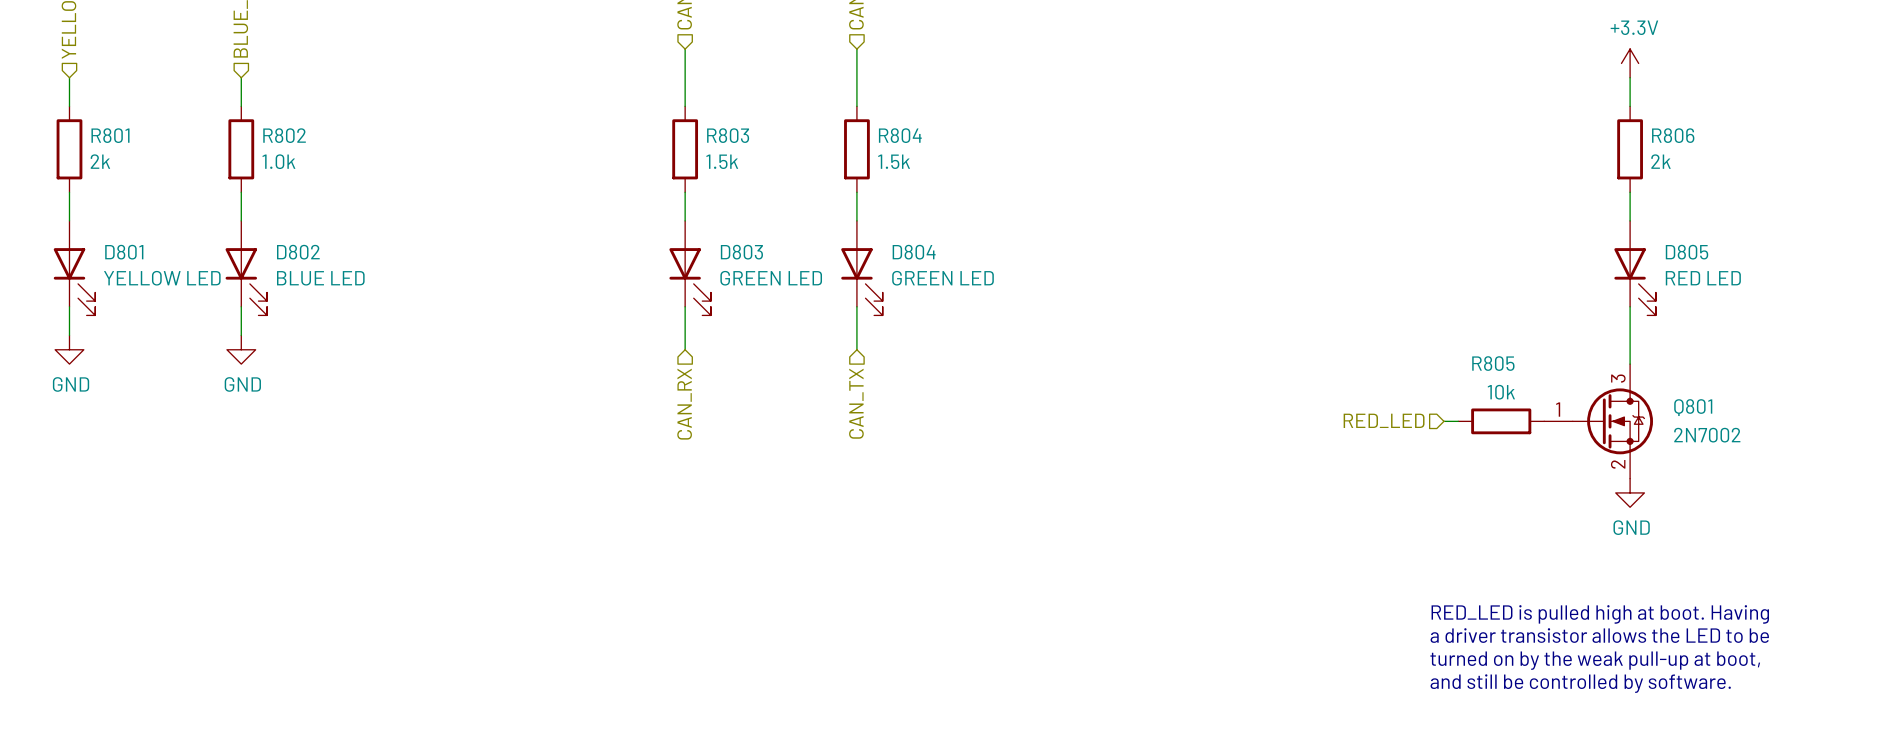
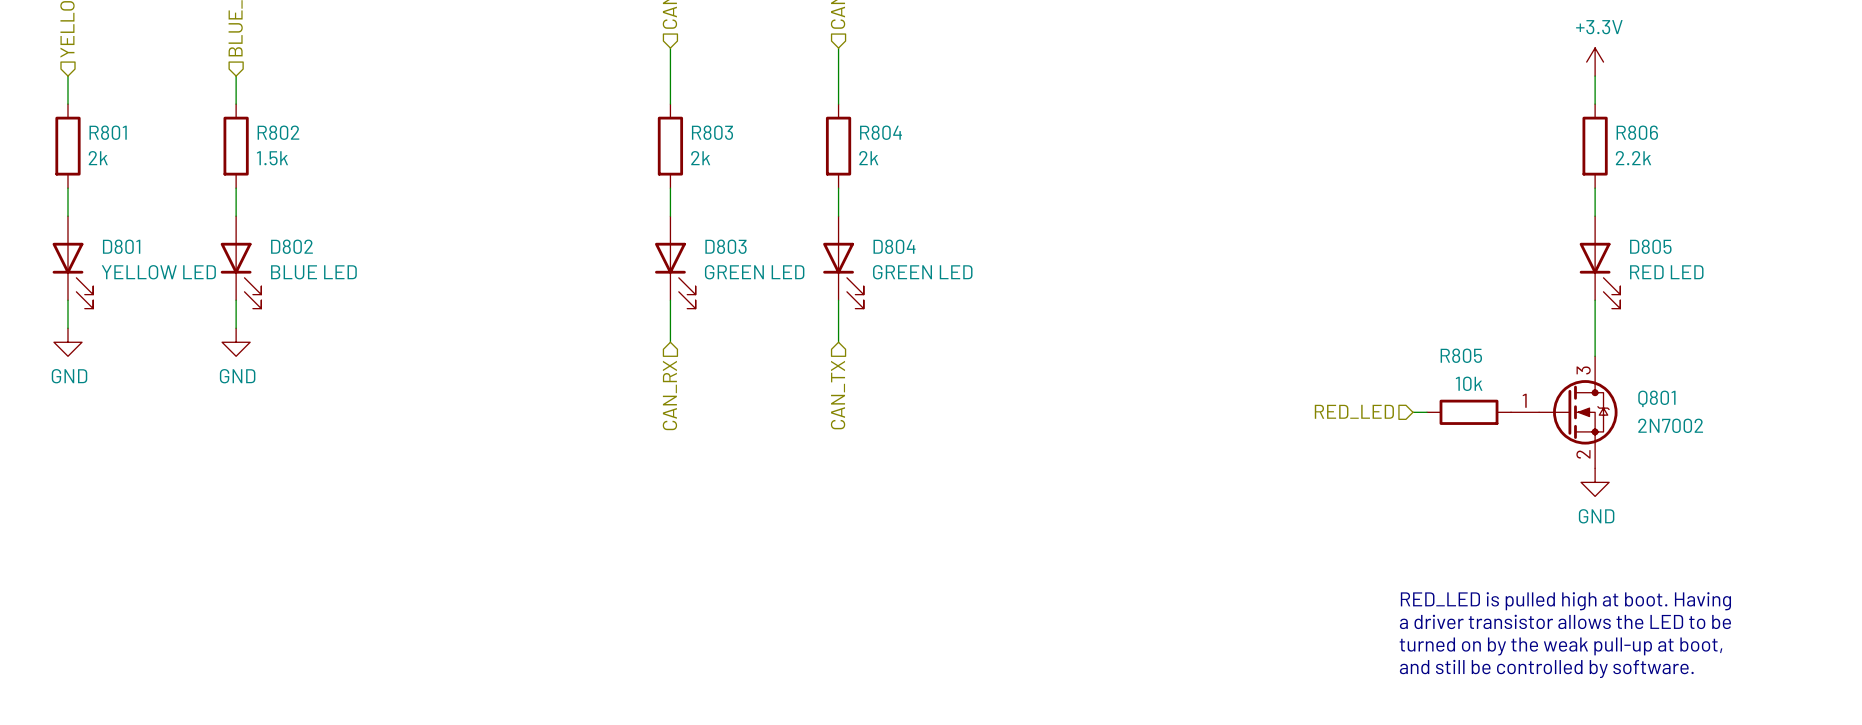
R802 value: 1.0k (278, 161) -> 1.5k (272, 158)
R803 value: 1.5k (722, 161) -> 2k (700, 158)
R804 value: 1.5k (894, 161) -> 2k (868, 158)
R806 value: 2k (1661, 161) -> 2.2k (1633, 158)

